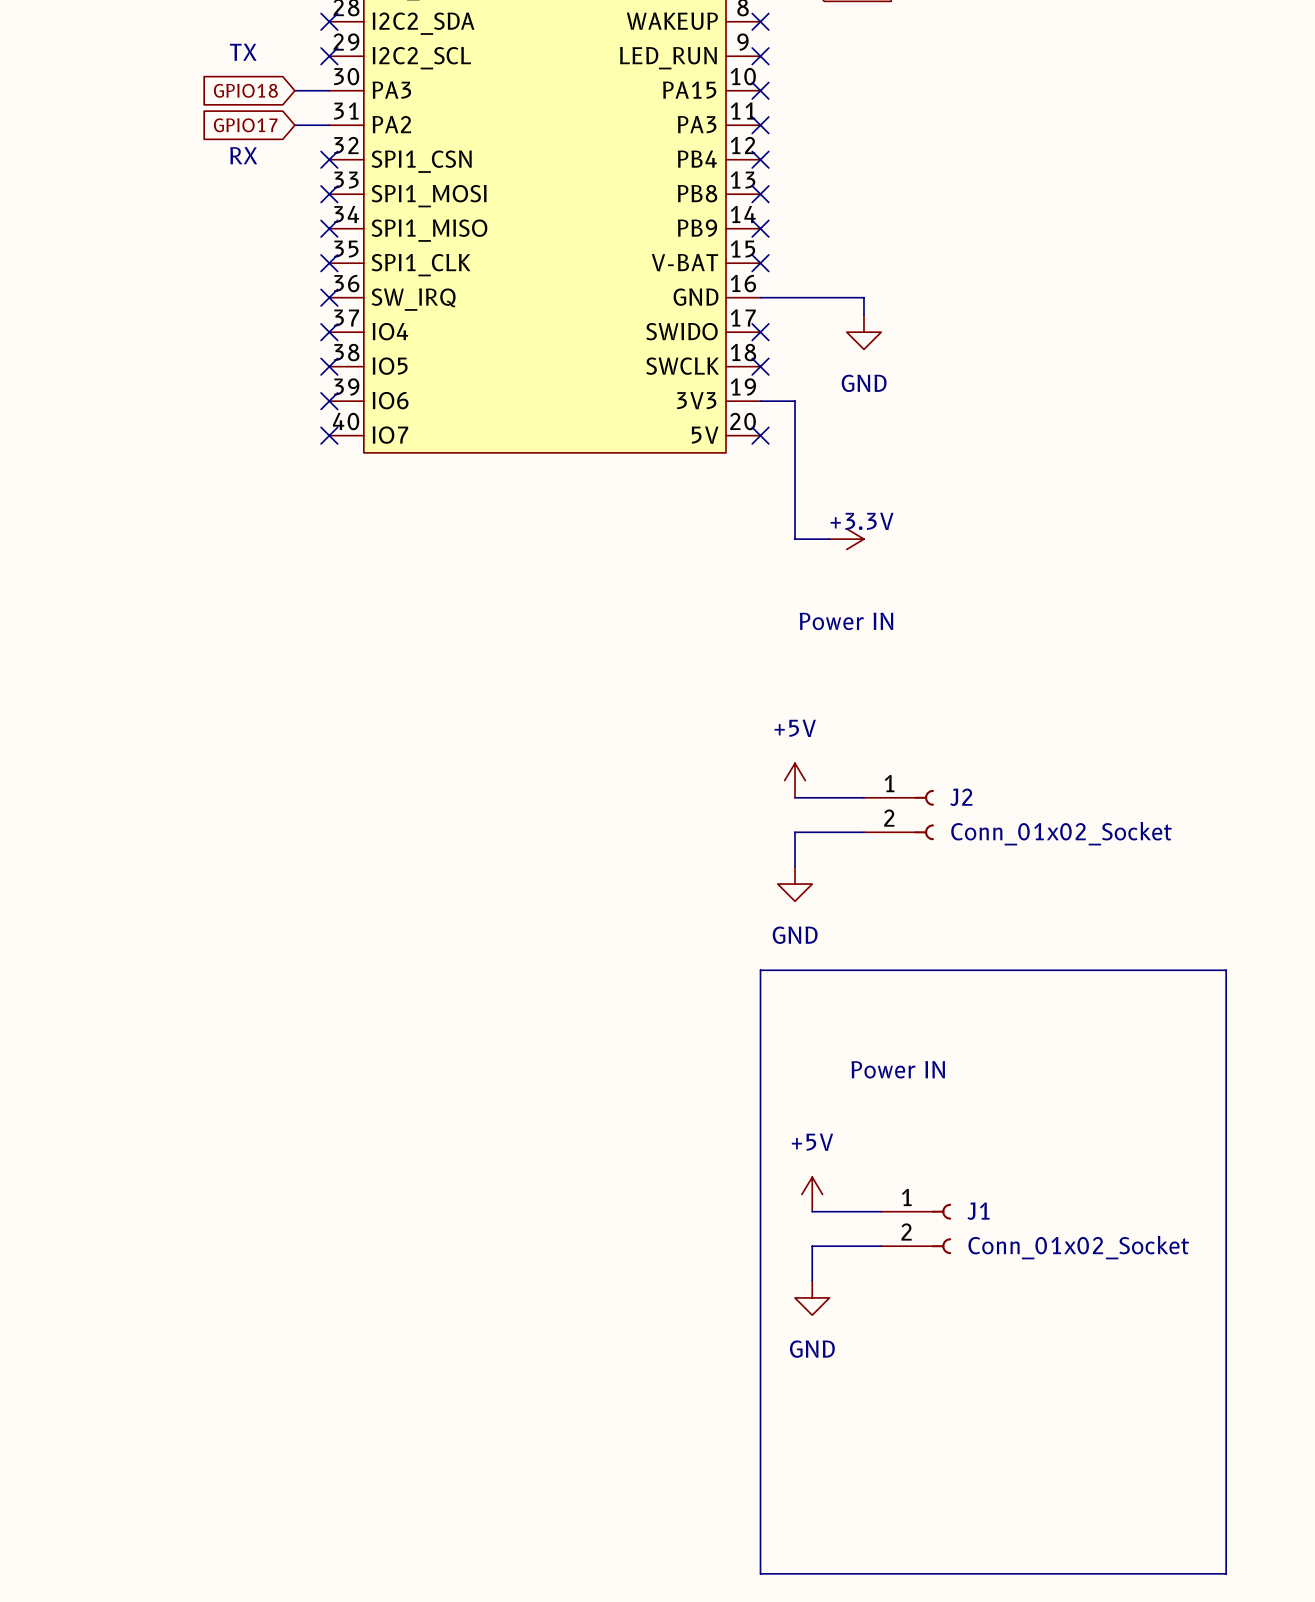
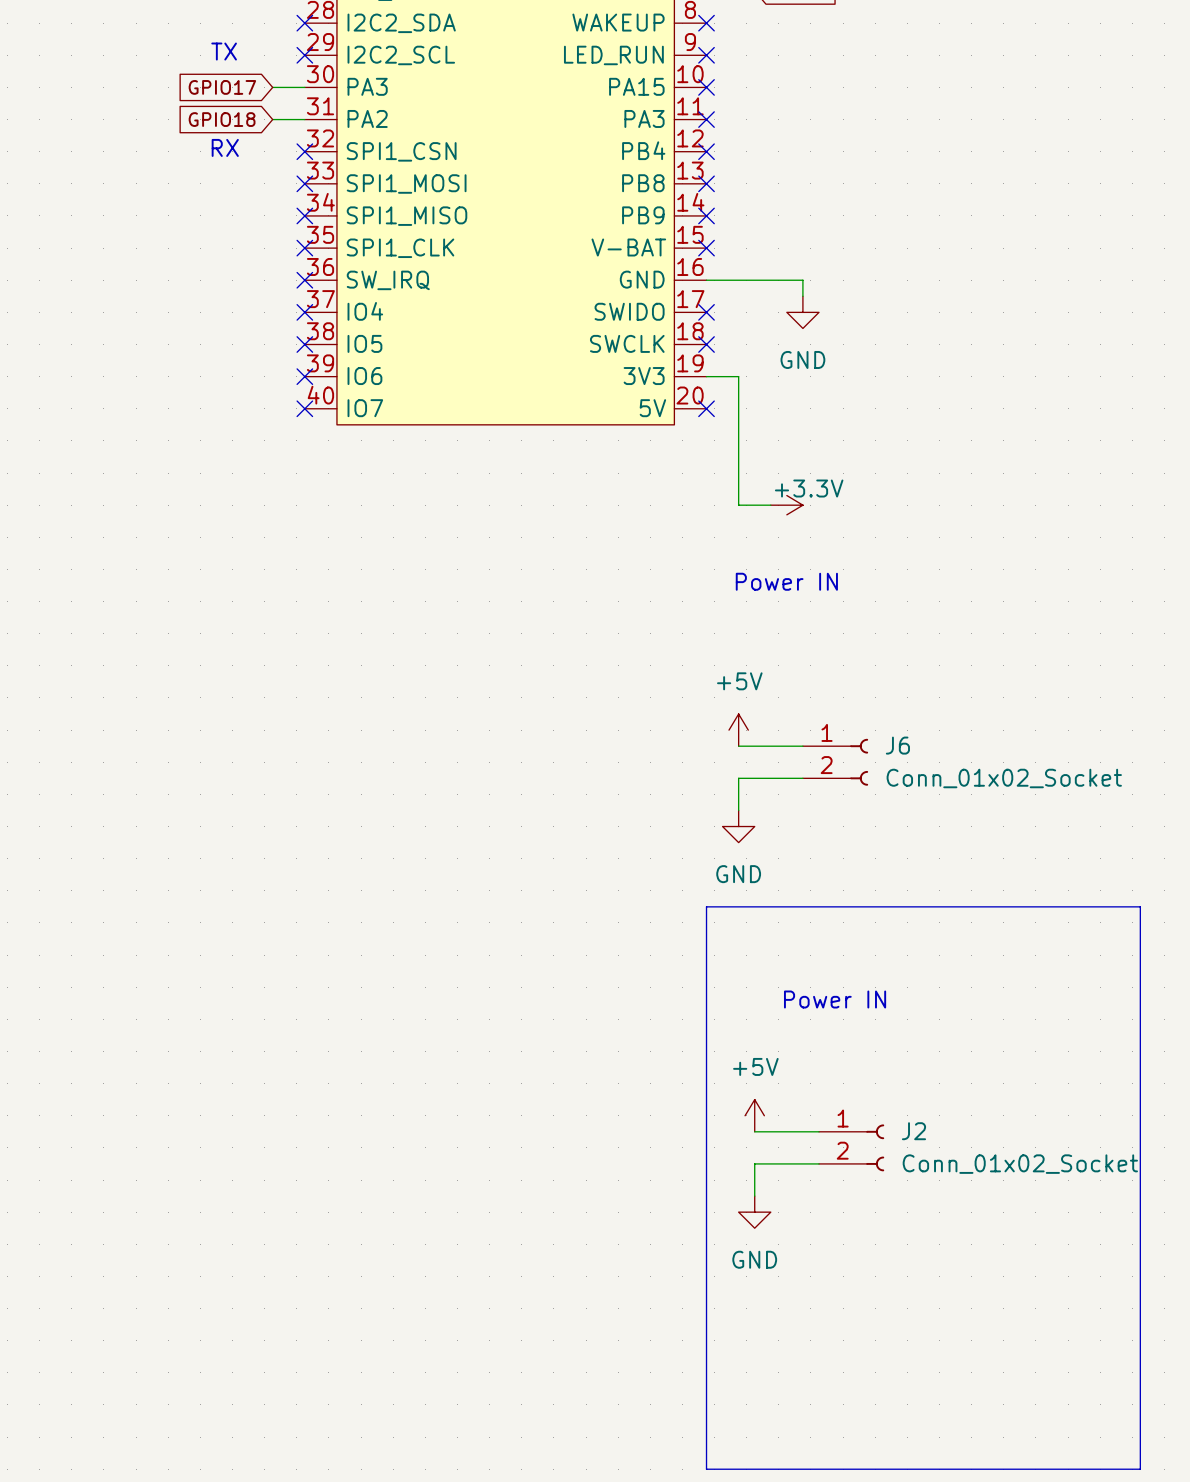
global label: GPIO18 (245, 90) -> GPIO17 (222, 87)
global label: GPIO17 (245, 125) -> GPIO18 (222, 119)
J2 name: J2 (961, 797) -> J6 (897, 745)
J1 name: J1 (978, 1211) -> J2 (913, 1131)

